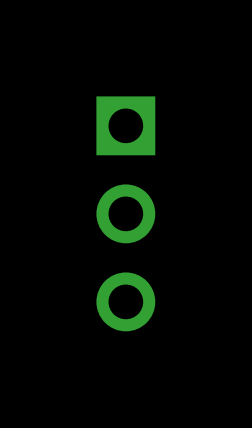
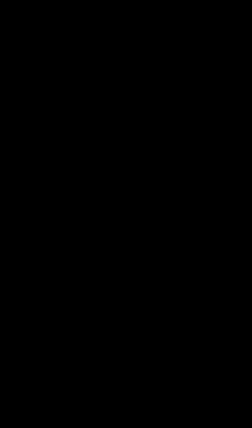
part: (125, 213) -> none

